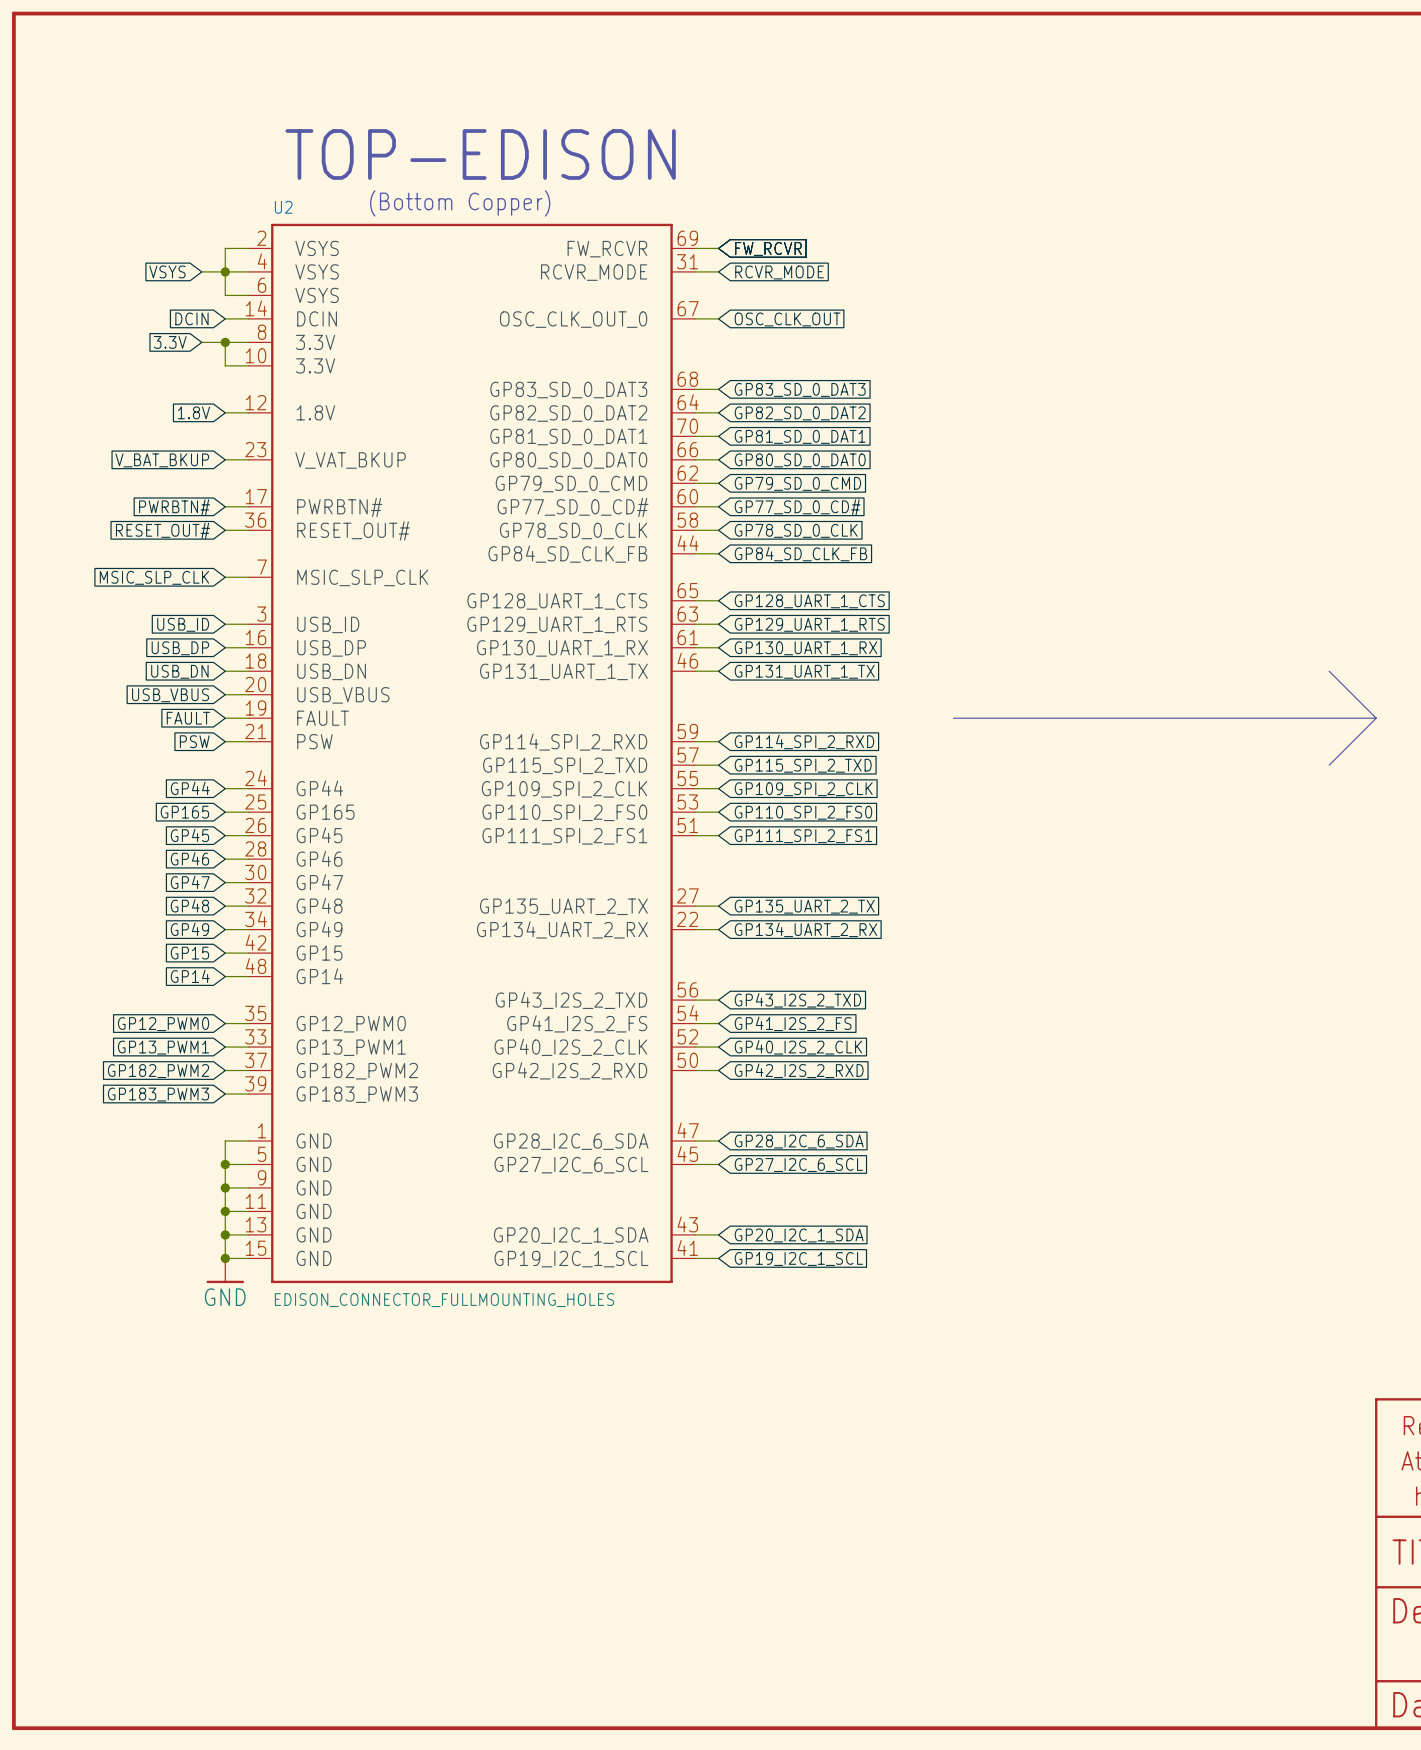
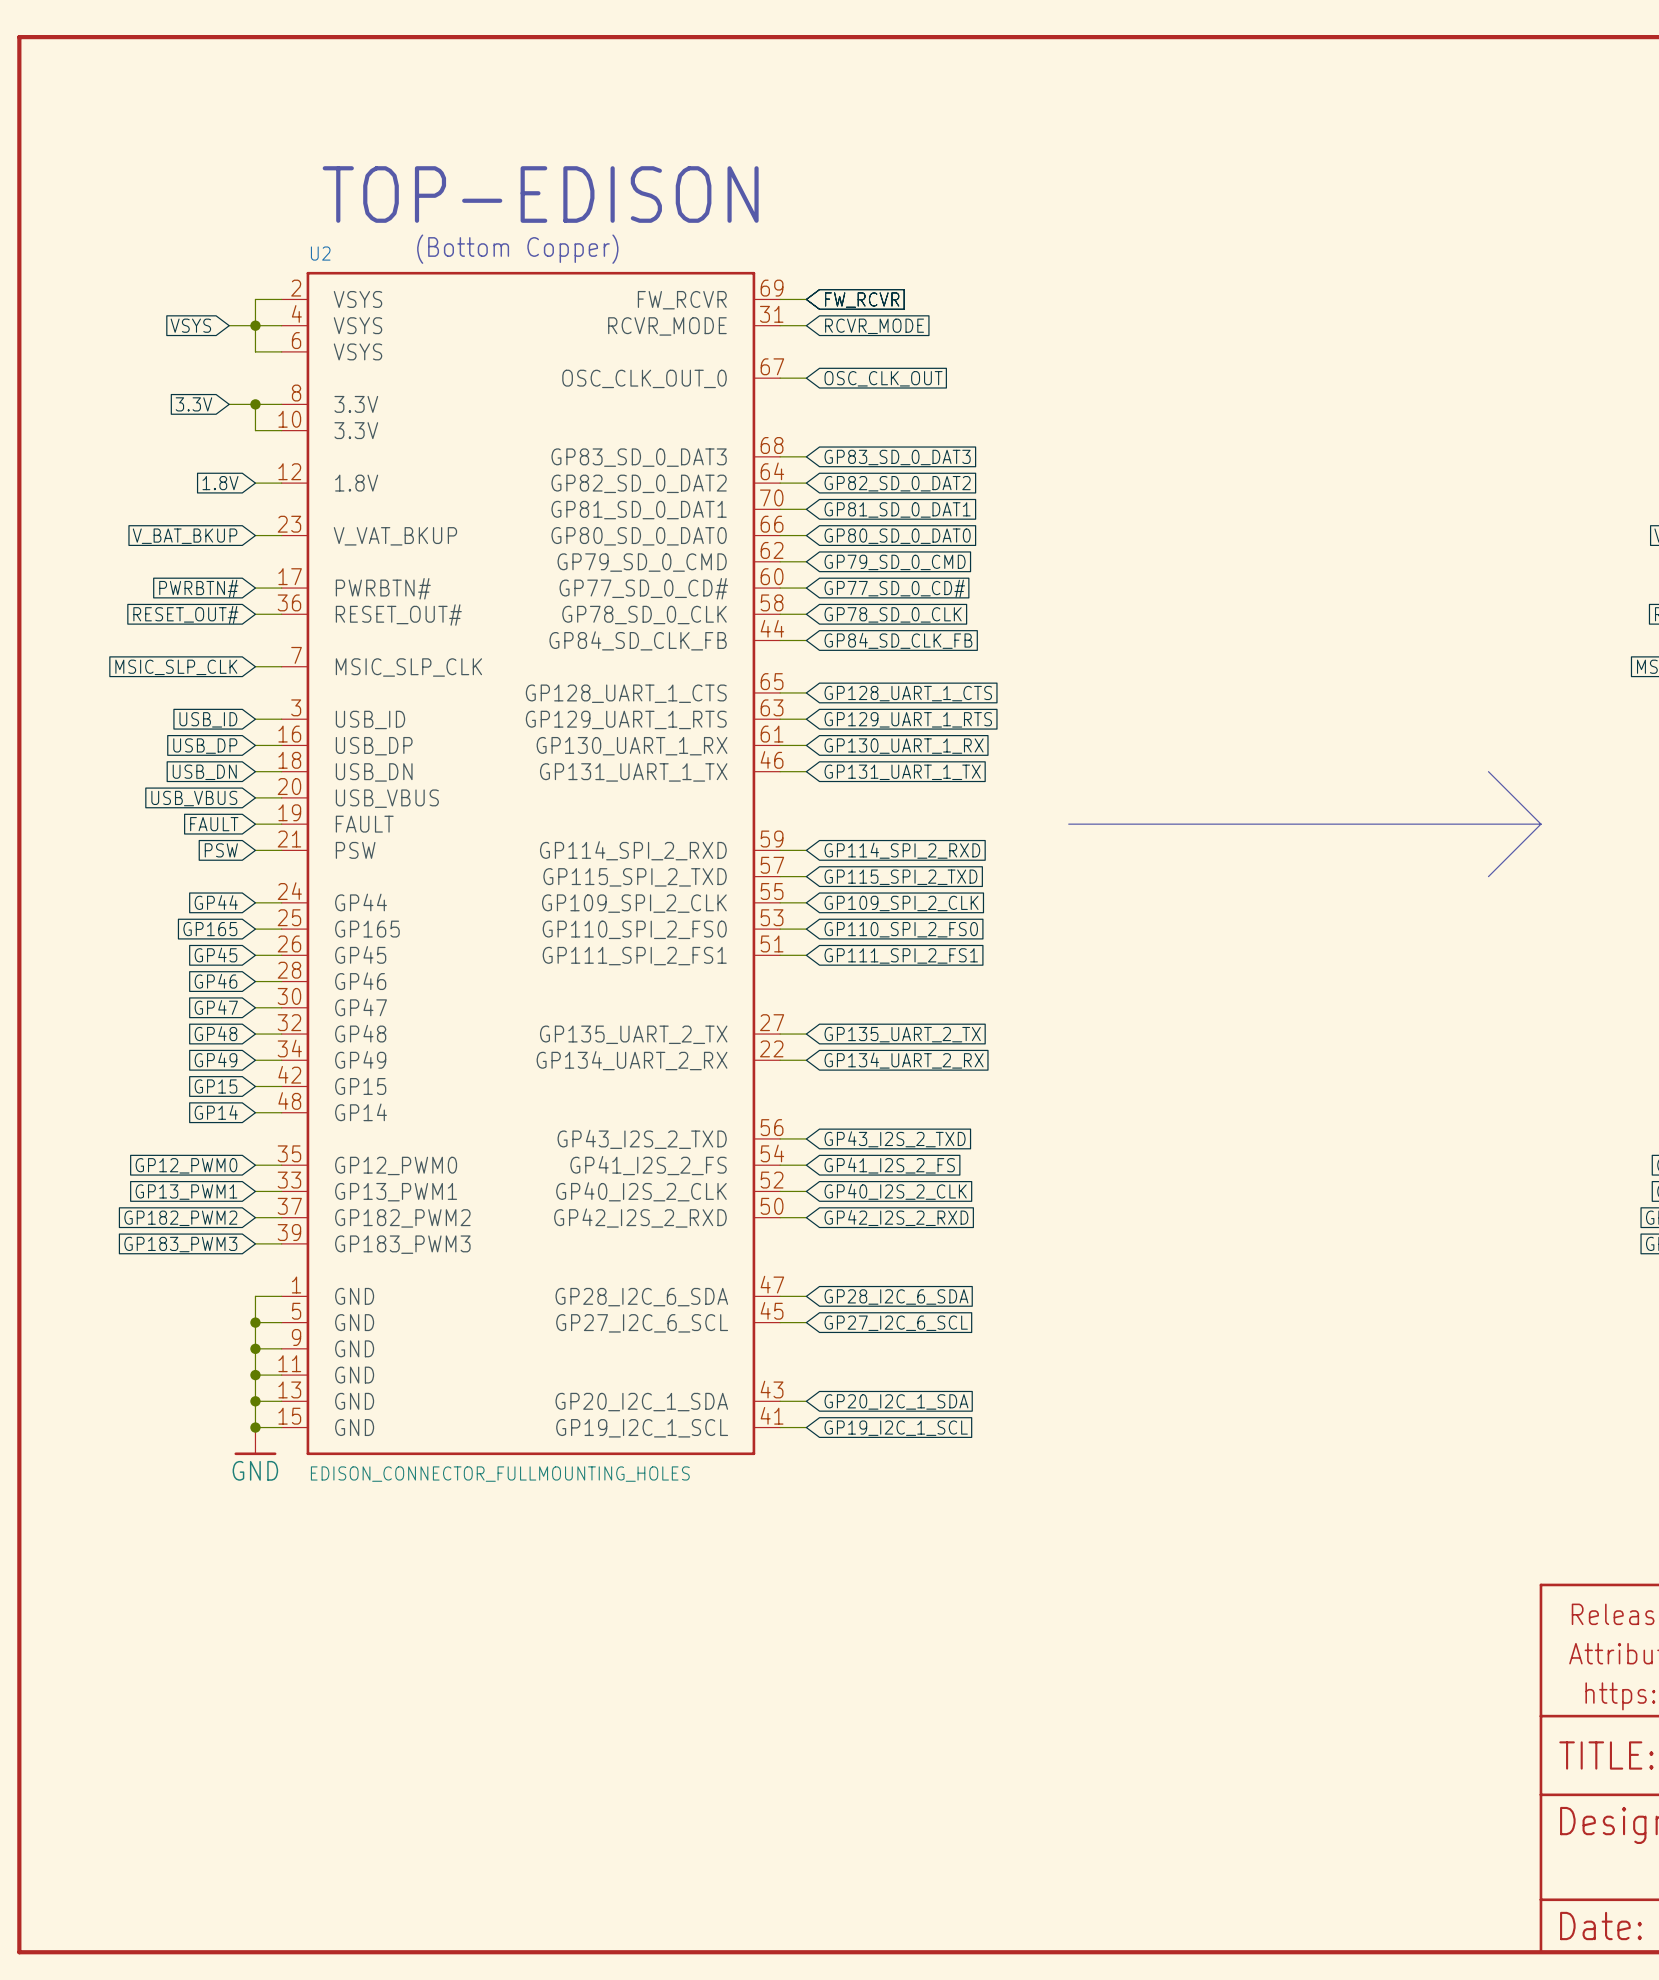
U2 symbol: [248, 223, 696, 1284] -> [281, 271, 781, 1456]
global label: DCIN (191, 318) -> none
wire: (225, 318) (248, 318) -> none

